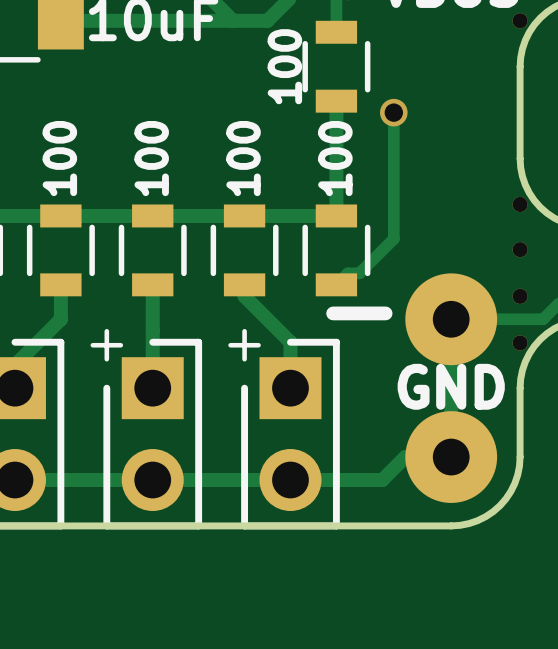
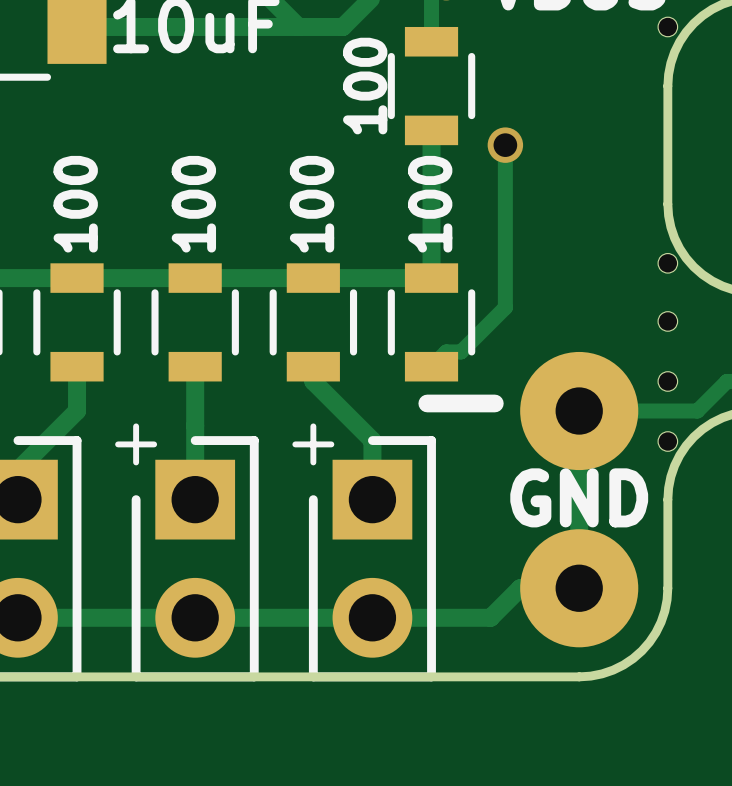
part footprint: [512, 13, 528, 29] -> [658, 17, 678, 37]
part footprint: [512, 196, 528, 213] -> [658, 253, 678, 274]
part footprint: [512, 242, 528, 351] -> [658, 311, 678, 452]

